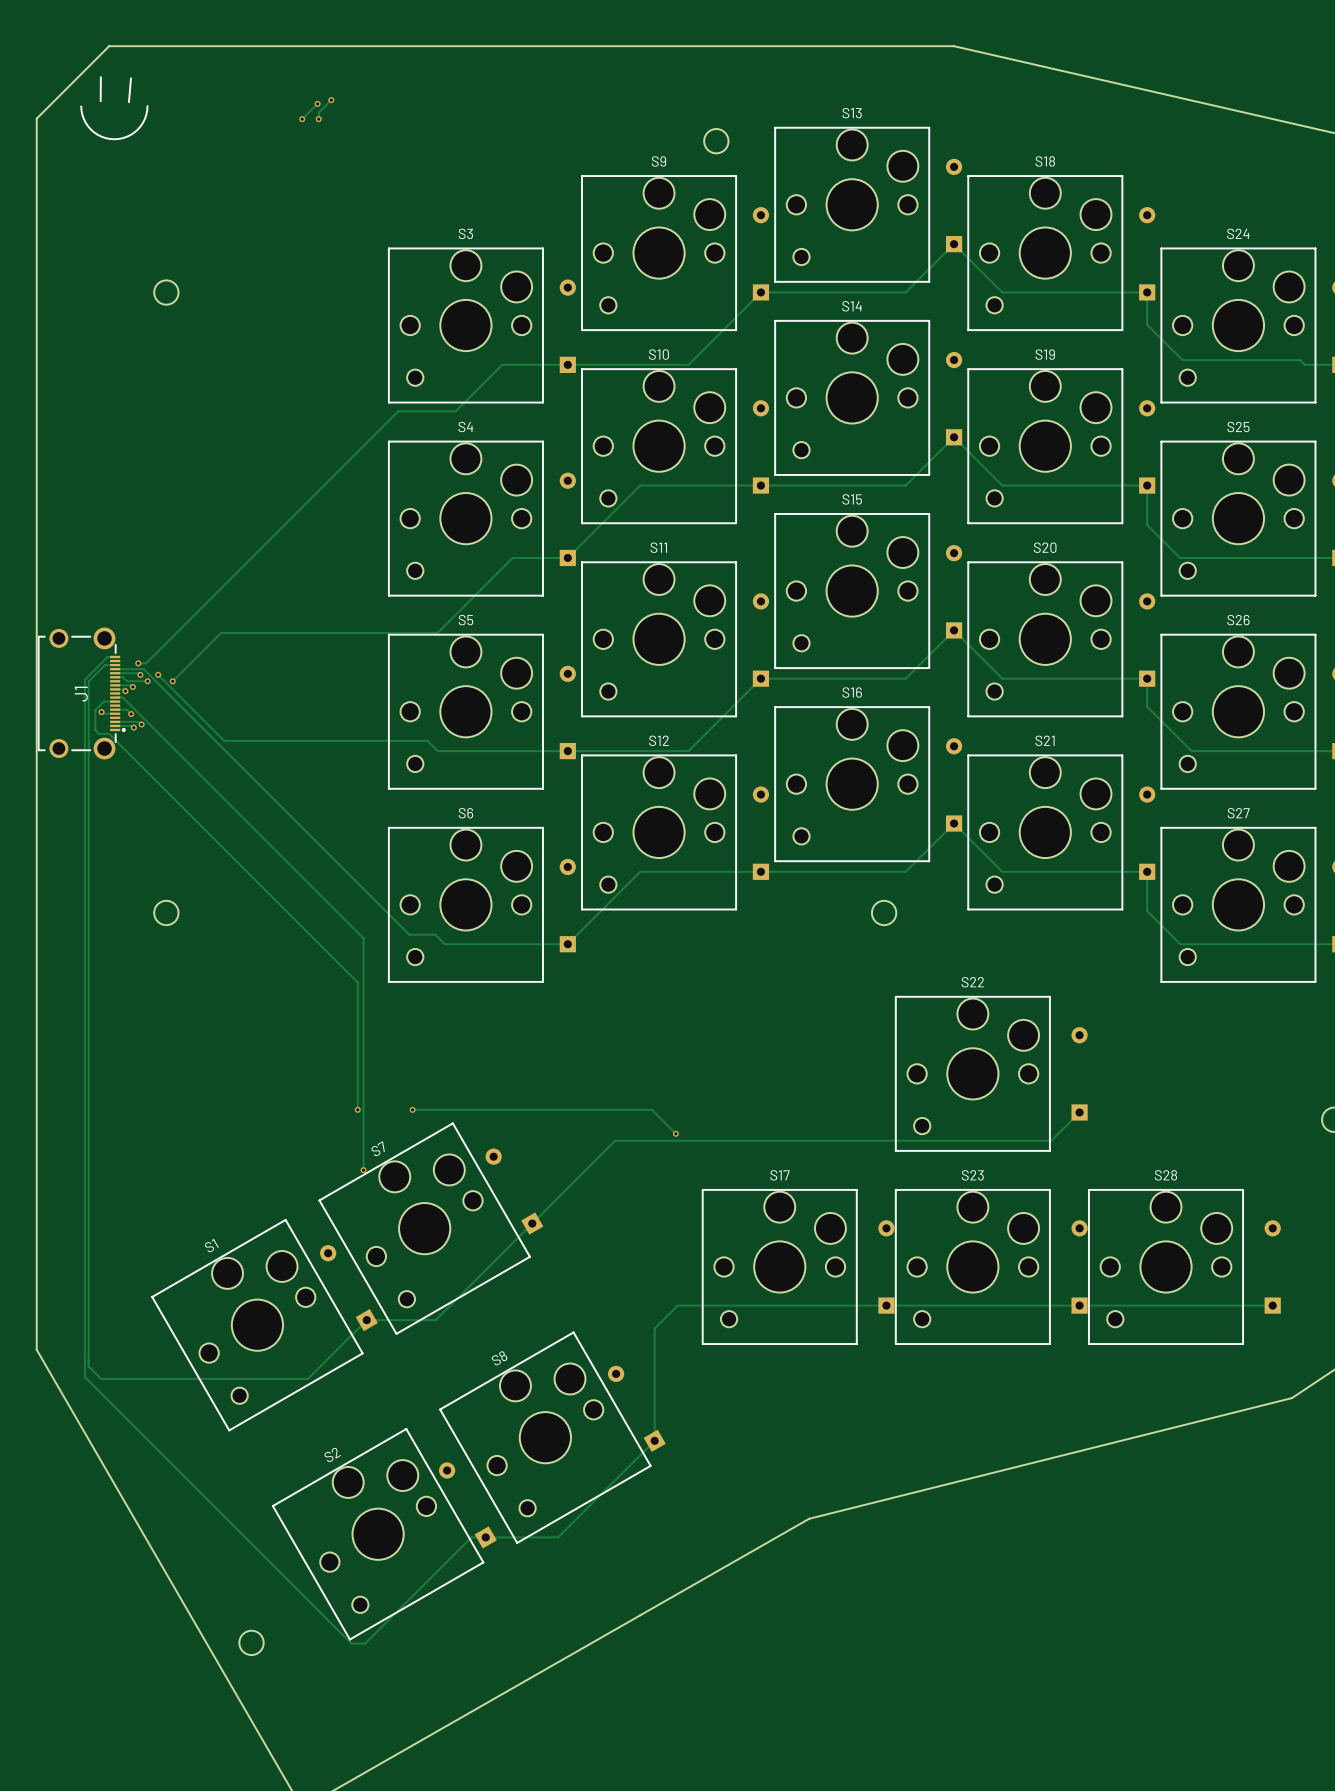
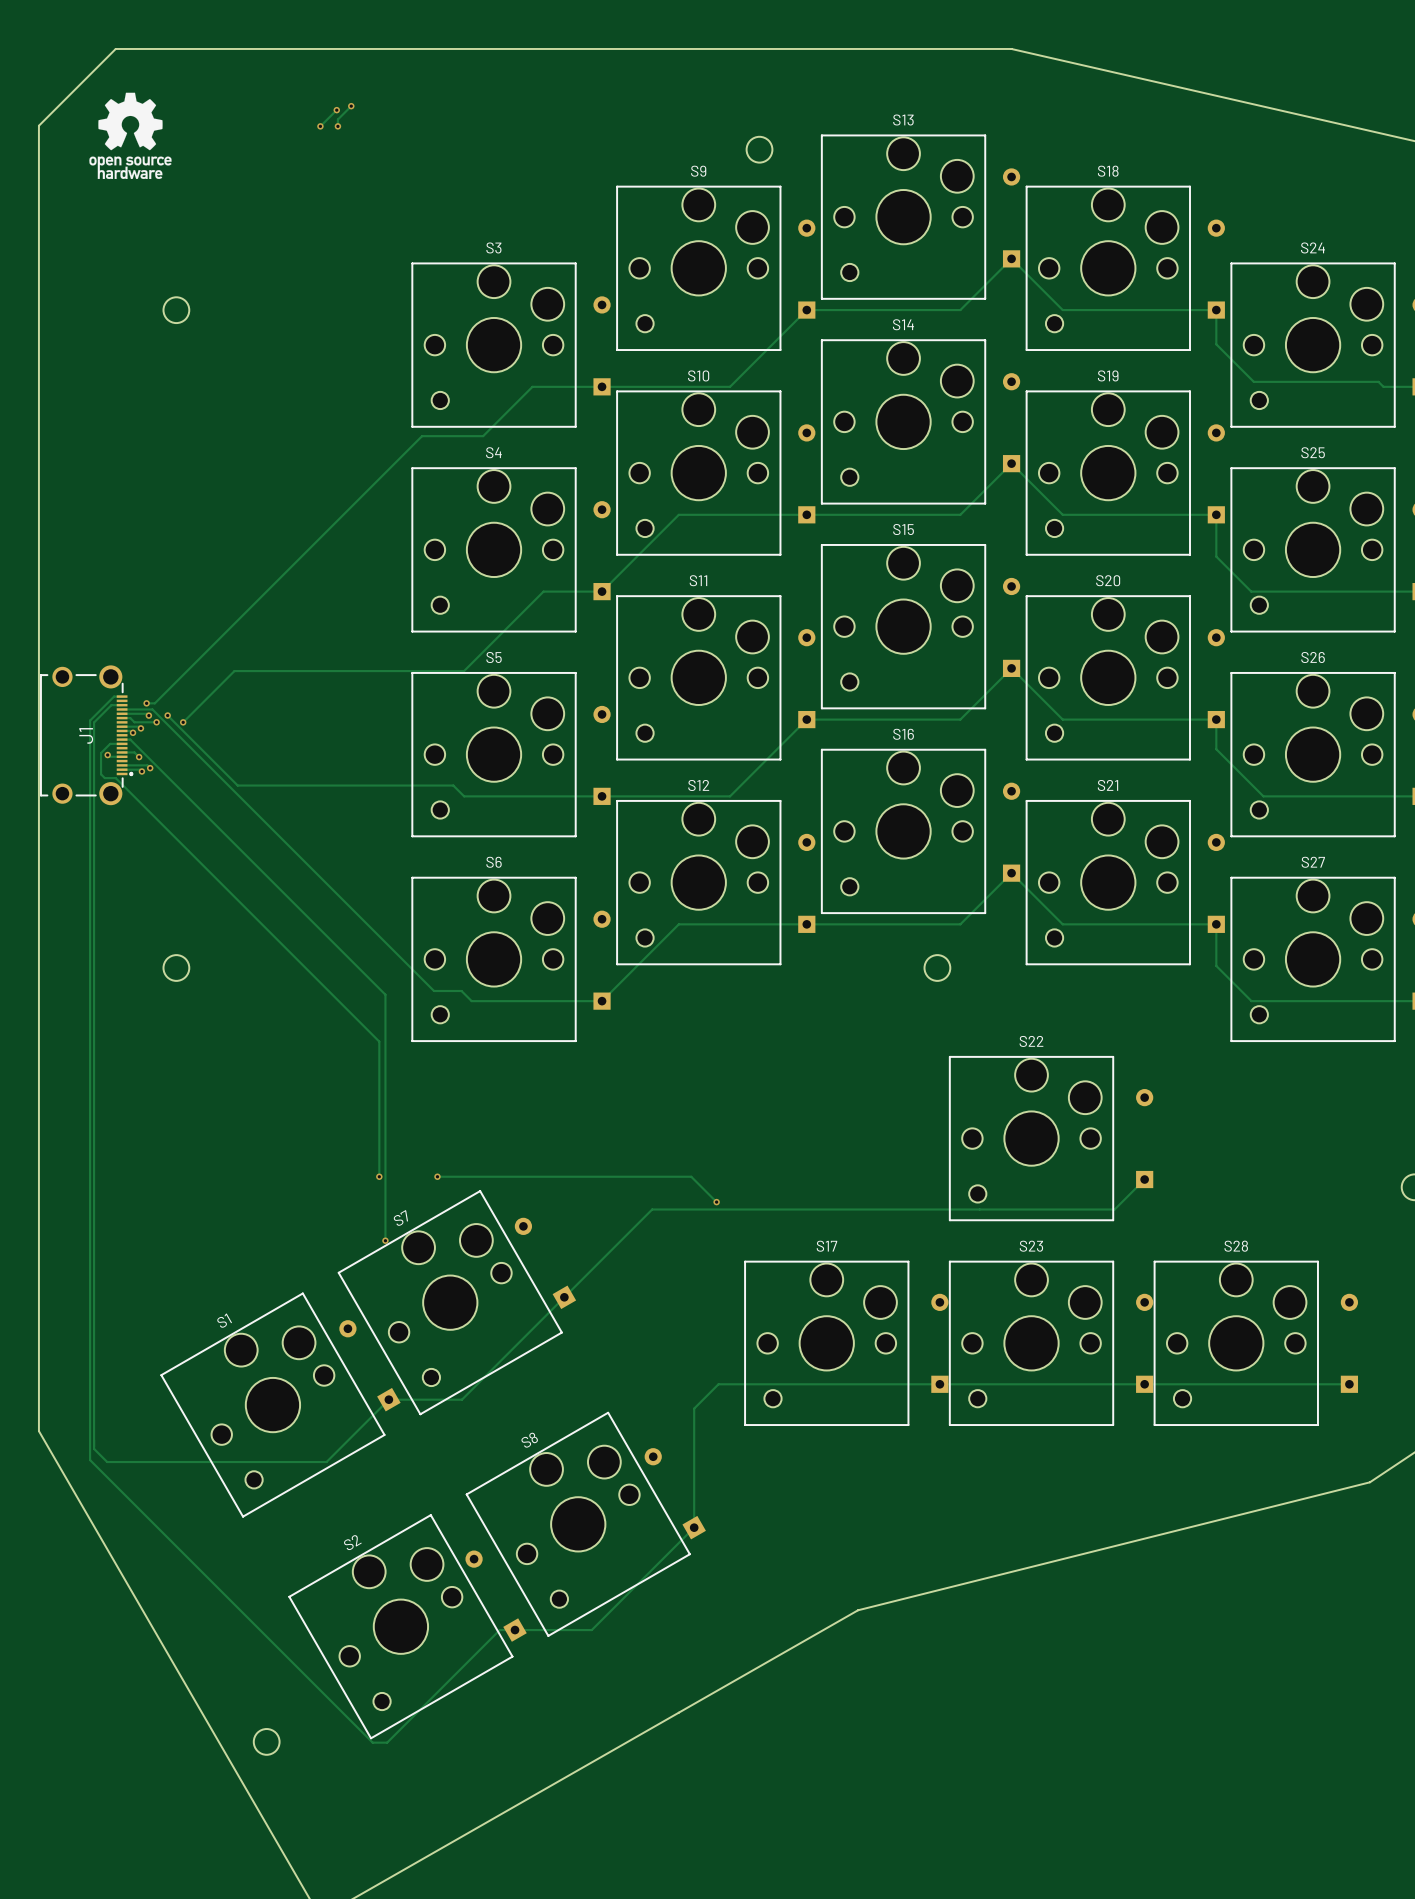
line: (100, 77) (100, 101) -> none
line: (130, 78) (128, 102) -> none
drawing: none -> [89, 92, 172, 180]
line: (147, 106) (145, 118) (137, 129) (127, 136) (114, 139) (101, 136) (91, 129) (83, 119) (81, 106) -> none

